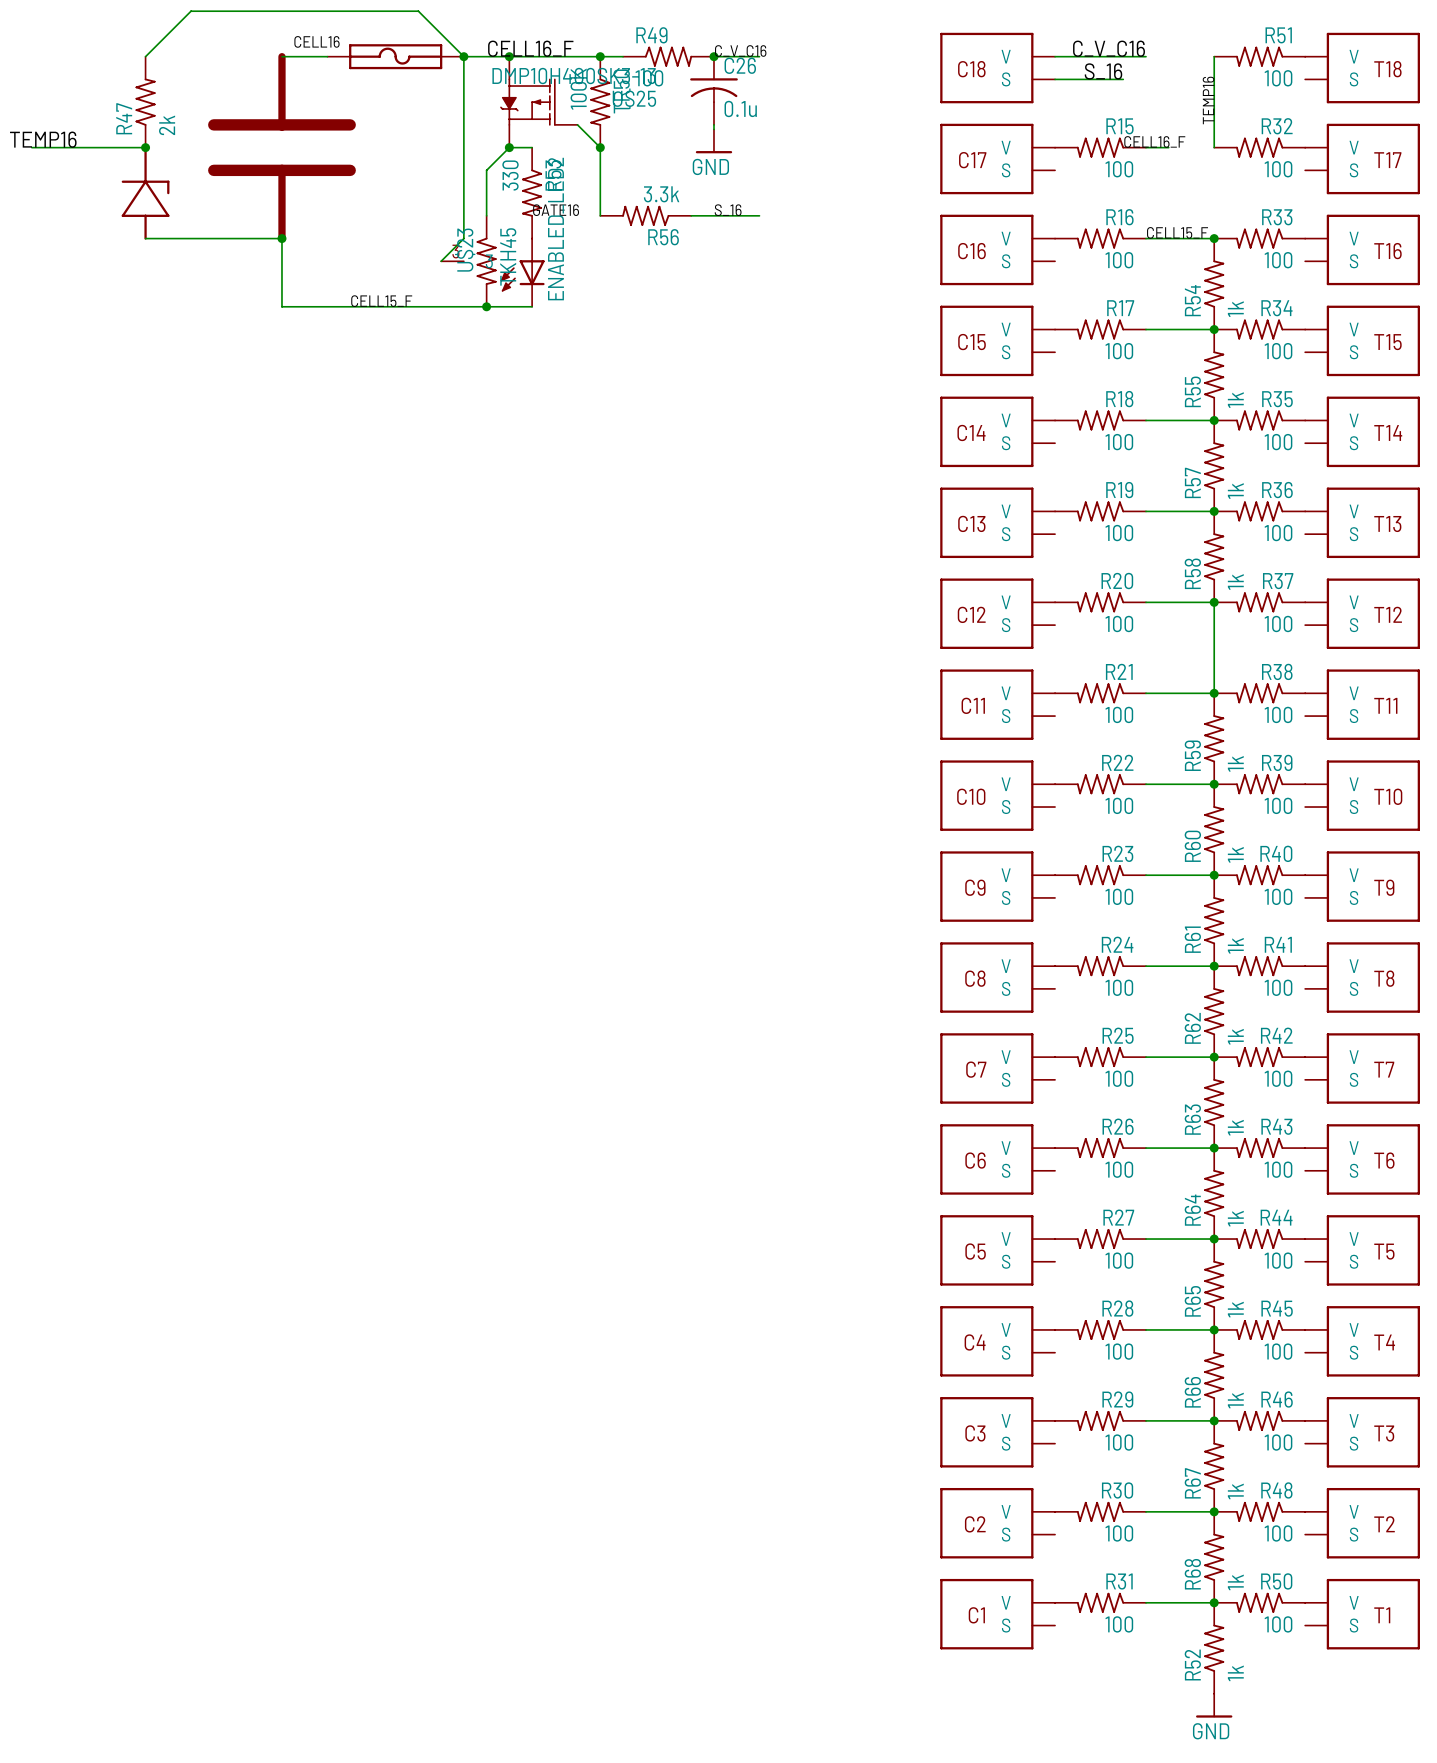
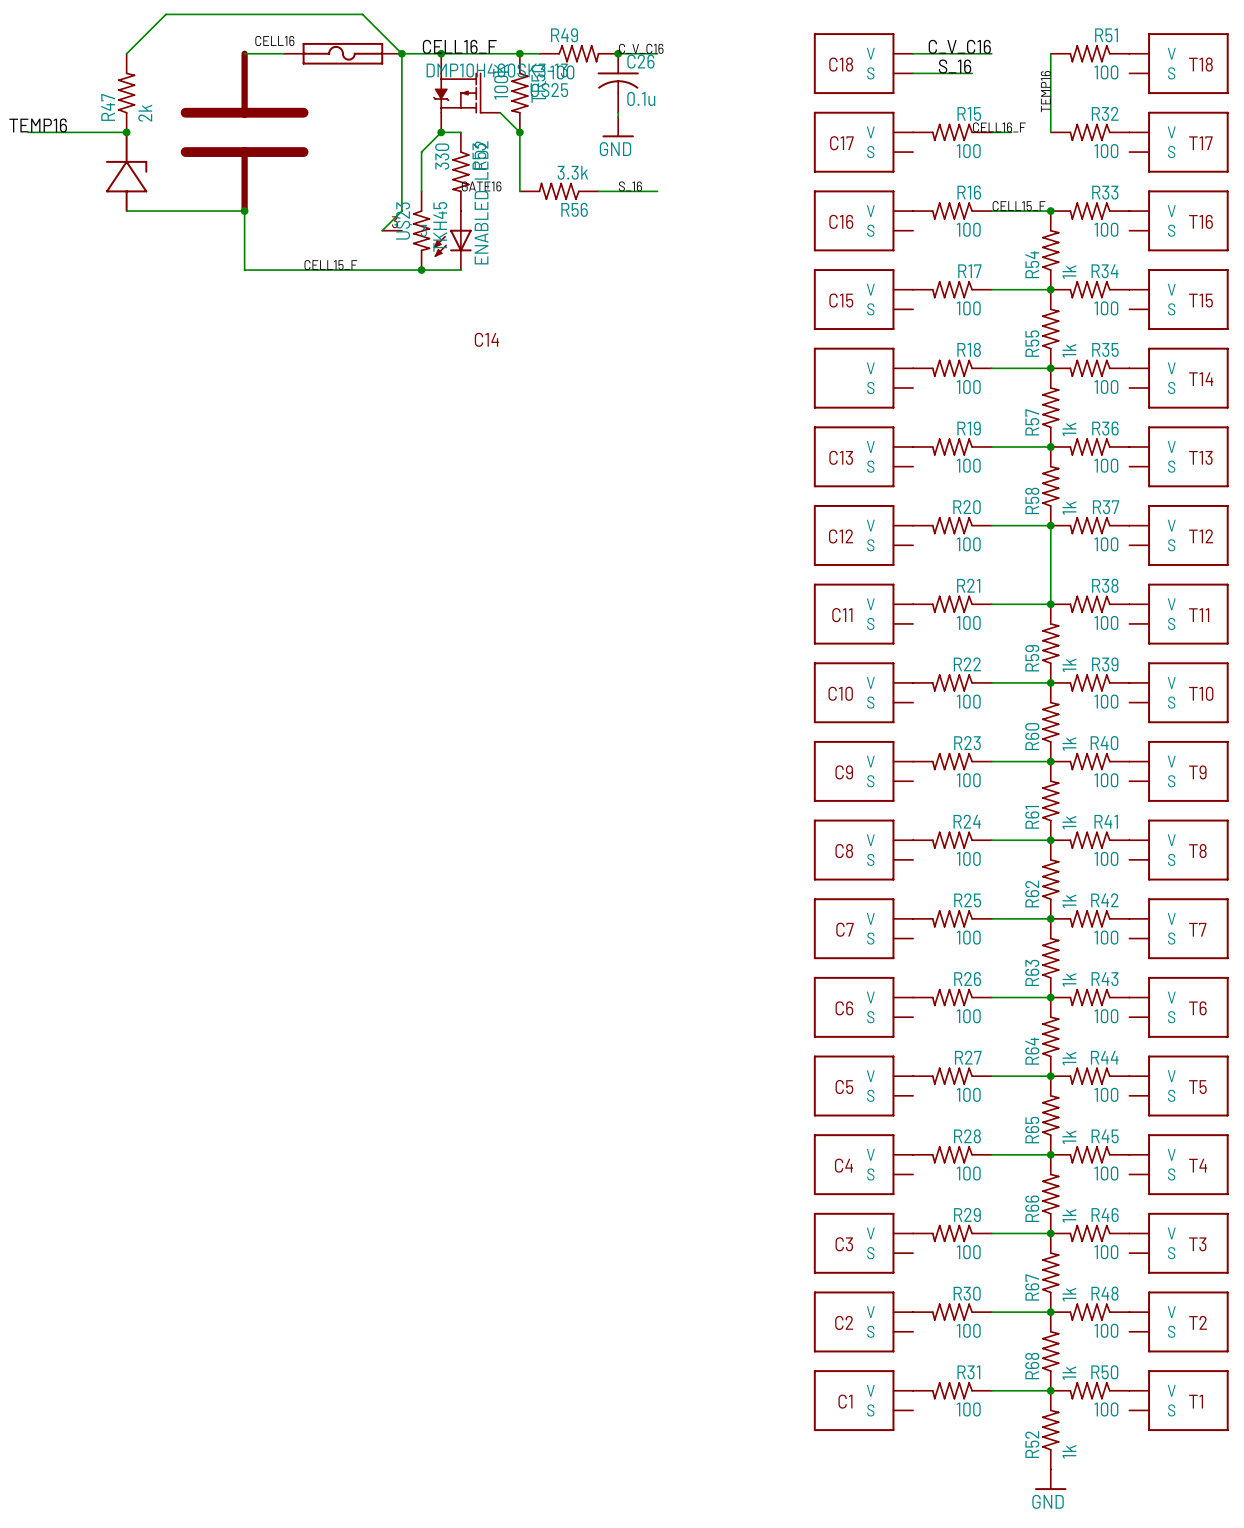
C14 name position: C14 (971, 432) -> C14 (486, 339)

